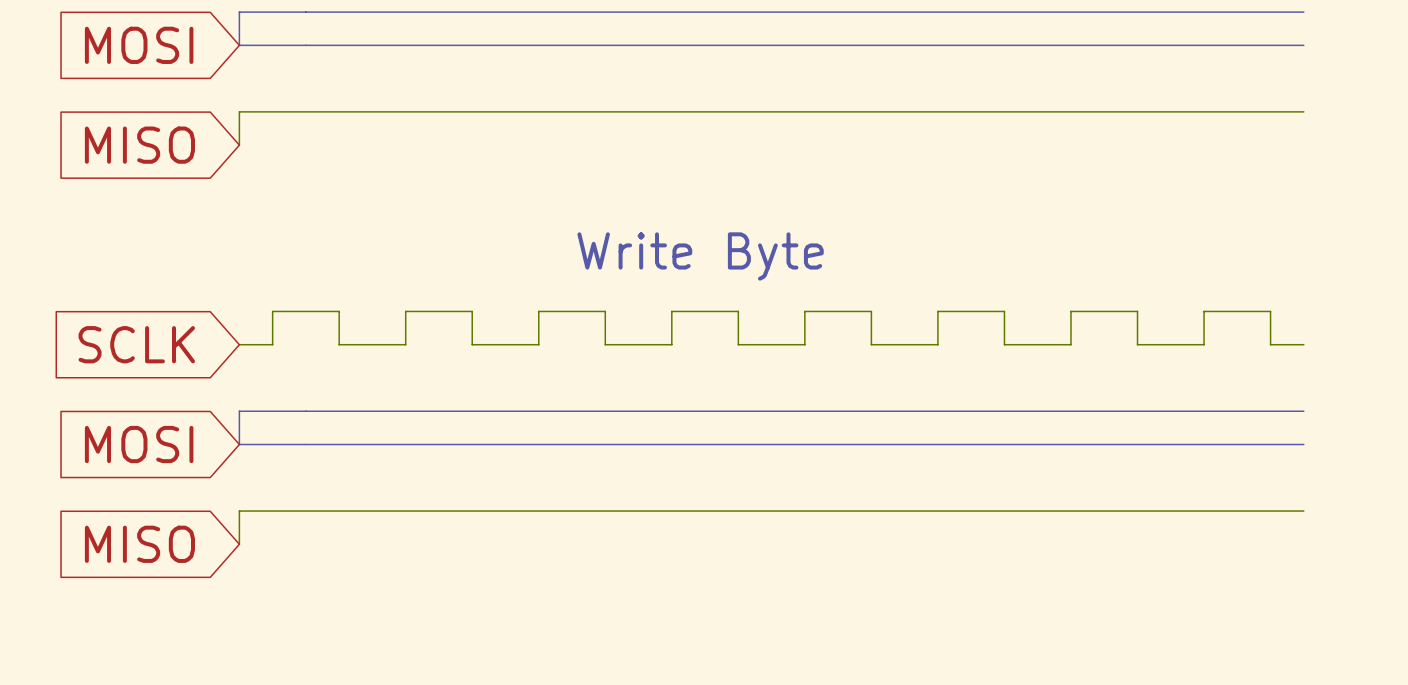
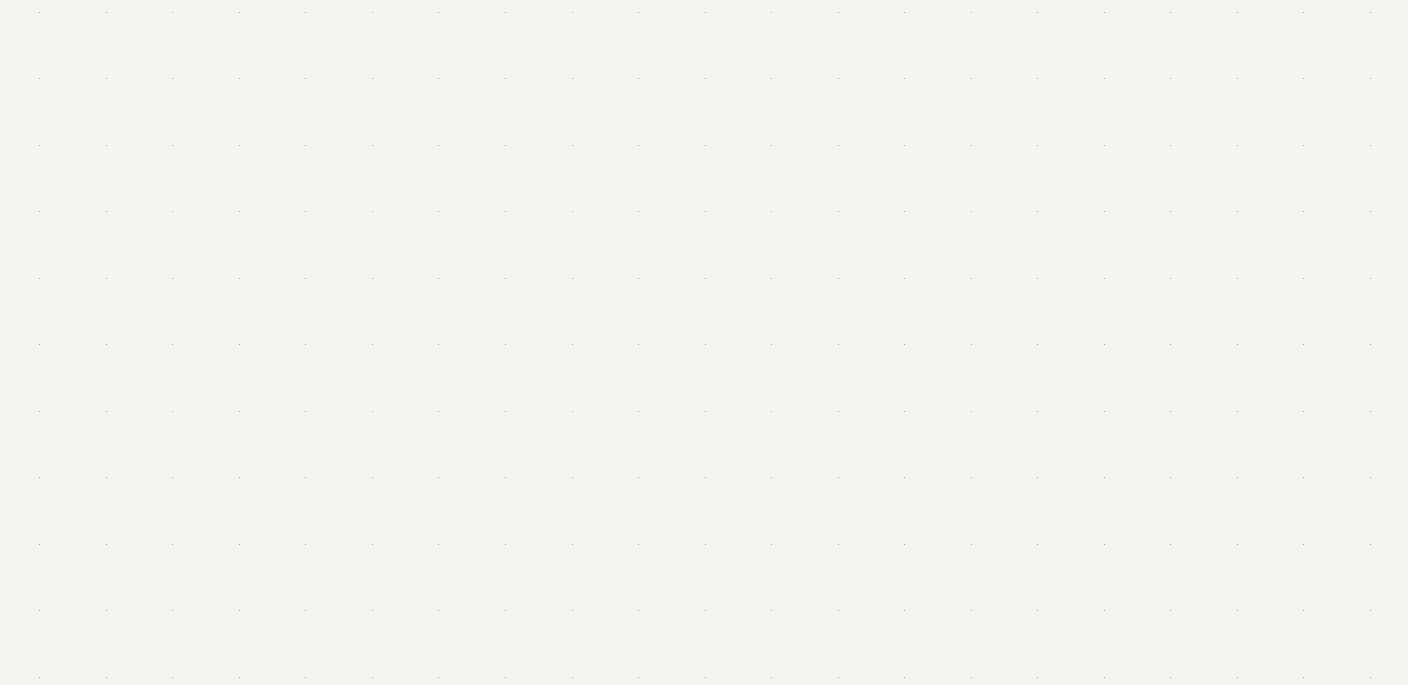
line: (1303, 12) (239, 12) (239, 45) (1303, 45) -> none
global label: MOSI (139, 45) -> none
wire: (1303, 111) (239, 111) (239, 145) -> none
global label: MISO (139, 145) -> none
text: Write Byte (700, 256) -> none
global label: SCLK (136, 344) -> none
wire: (239, 344) (272, 344) (272, 311) (339, 311) (339, 344) (405, 344) (405, 311) (472, 311) (472, 344) (538, 344) (538, 311) (605, 311) (605, 344) (671, 344) (671, 311) (738, 311) (738, 344) (804, 344) (804, 311) (871, 311) (871, 344) (937, 344) (937, 311) (1004, 311) (1004, 344) (1070, 344) (1070, 311) (1137, 311) (1137, 344) (1204, 344) (1204, 311) (1270, 311) (1270, 344) (1303, 344) -> none
line: (1303, 411) (239, 411) (239, 444) (1303, 444) -> none
global label: MOSI (139, 444) -> none
wire: (1303, 511) (239, 511) (239, 544) -> none
global label: MISO (139, 544) -> none

